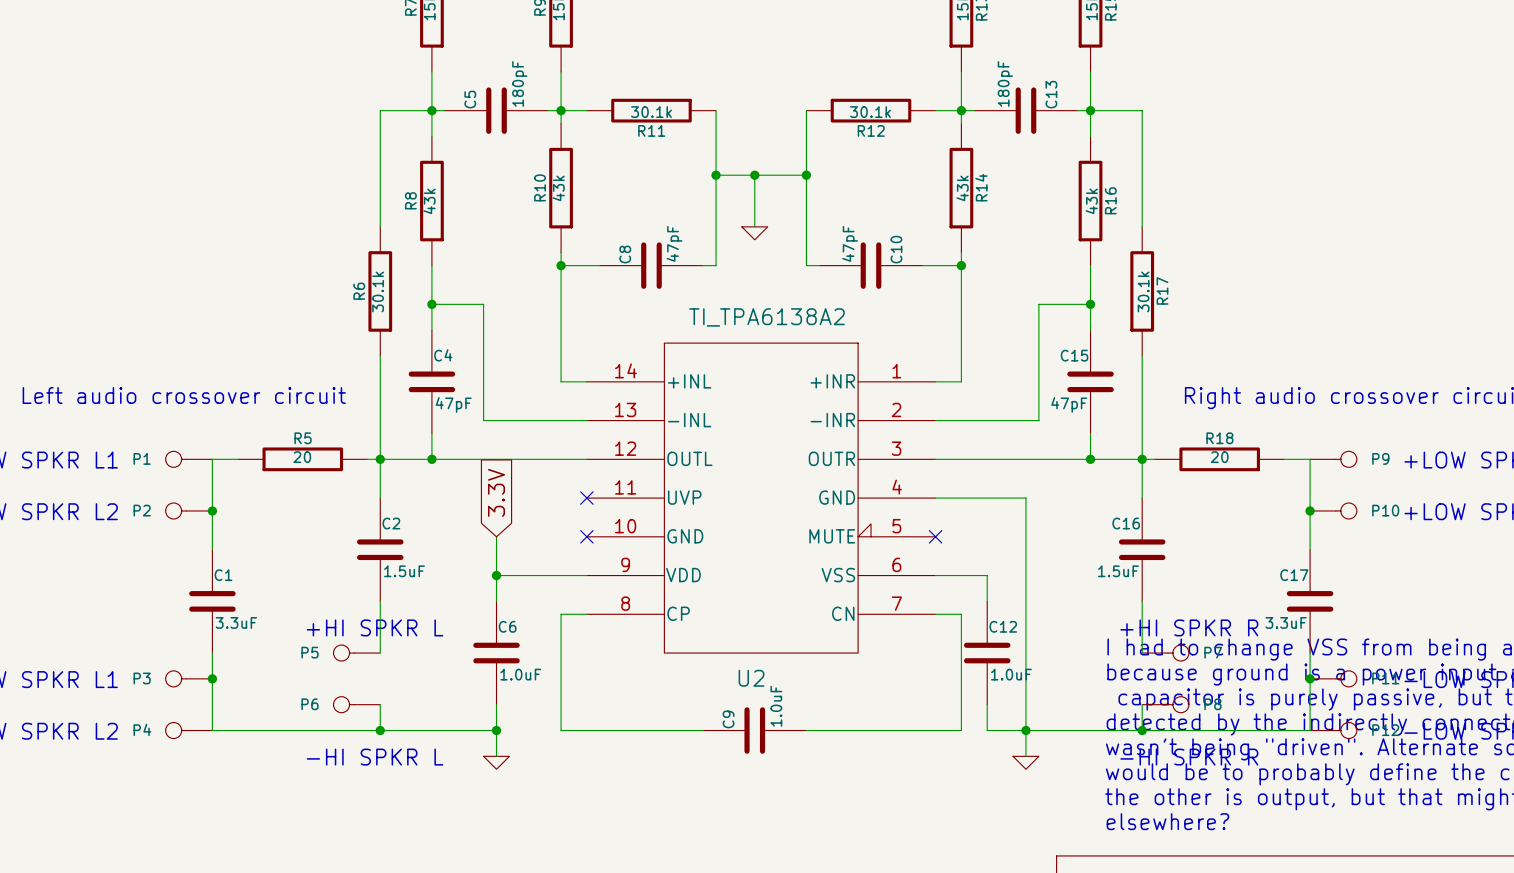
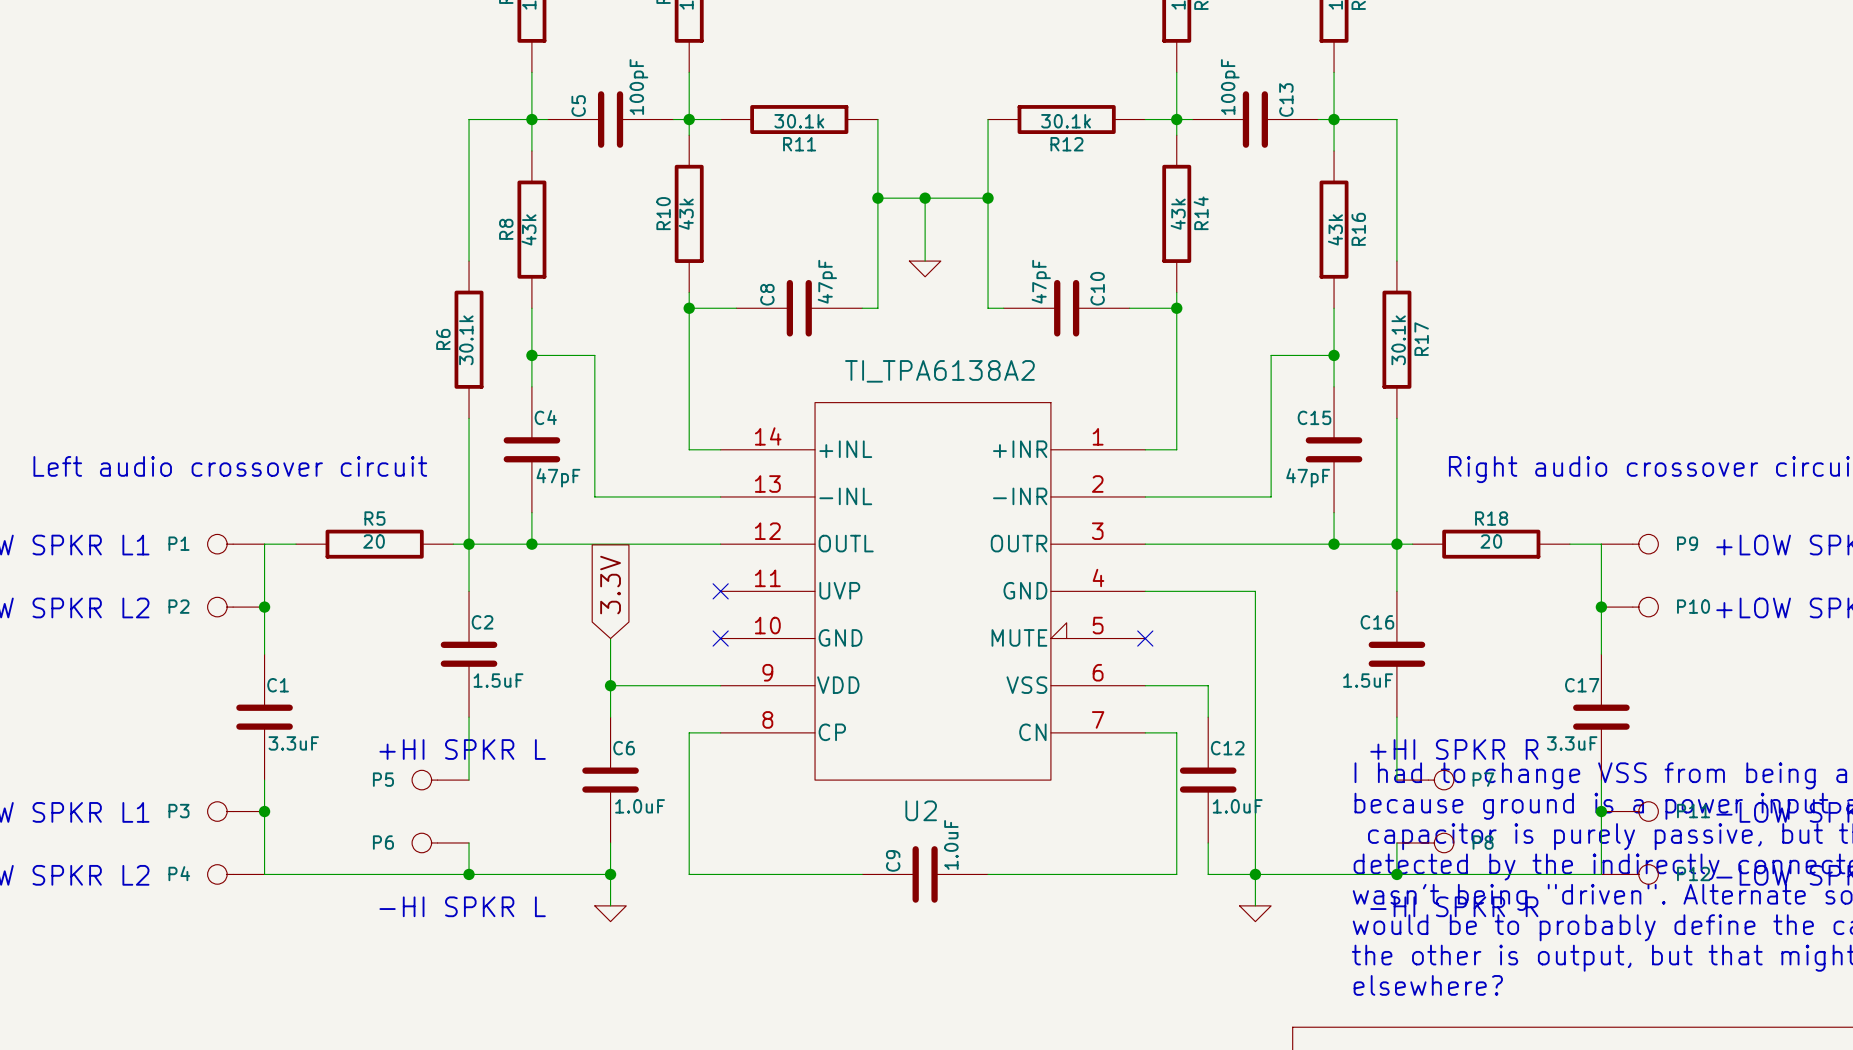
C5 value: 180pF (519, 83) -> 100pF (638, 87)
C13 value: 180pF (1005, 83) -> 100pF (1230, 87)

